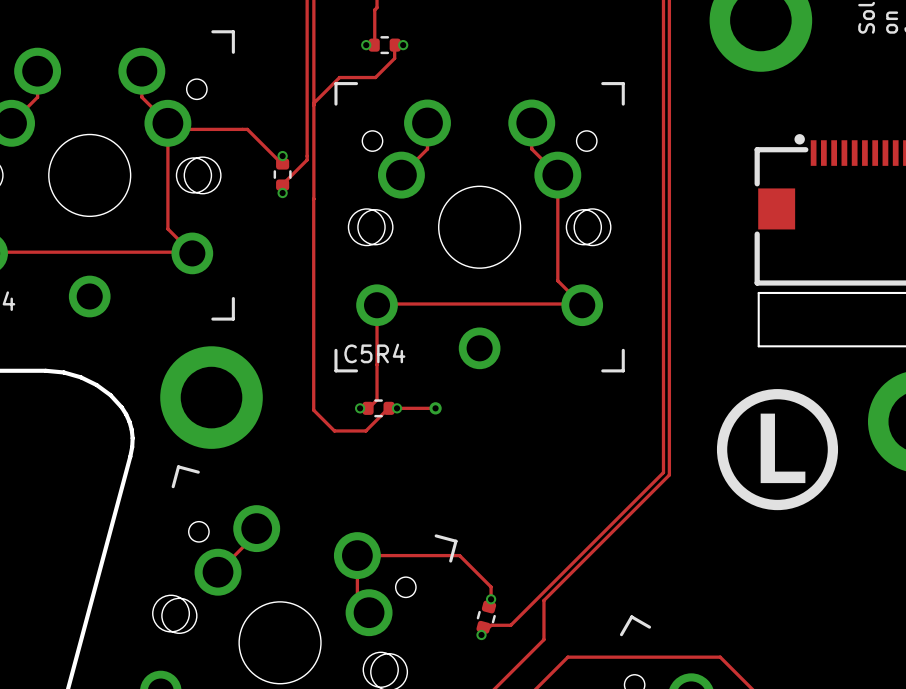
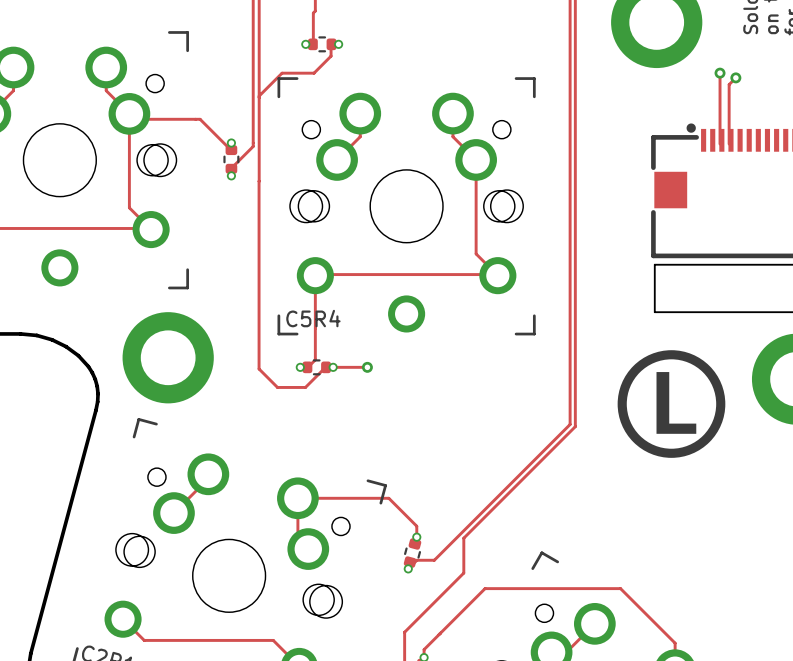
track: none -> (720, 73) (720, 144)
via: none -> (720, 73)
track: none -> (735, 77) (729, 84) (729, 144)
via: none -> (735, 77)

